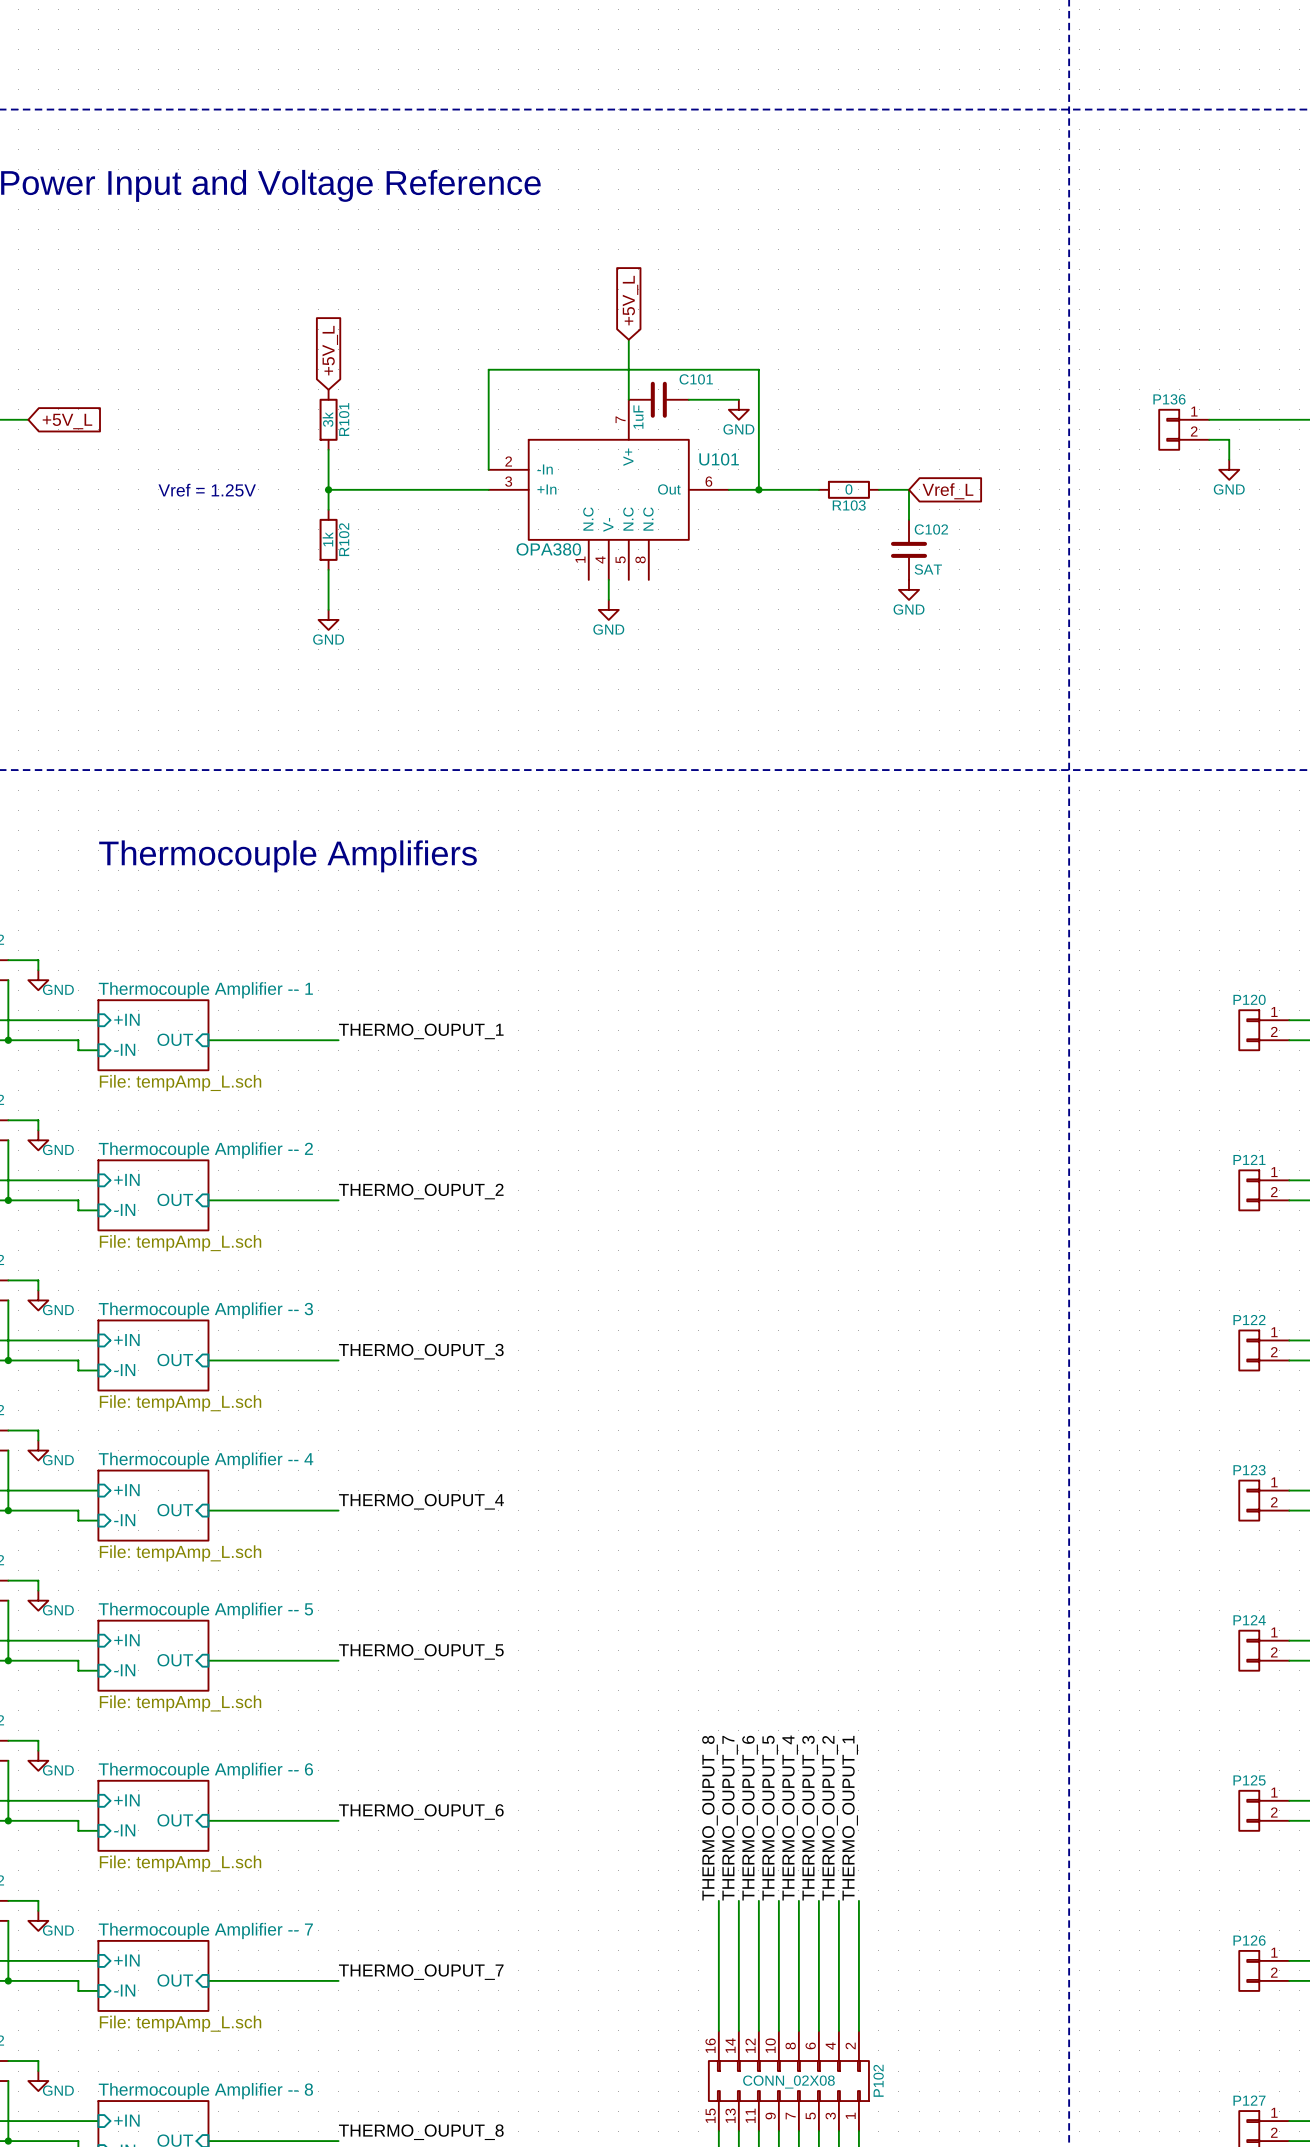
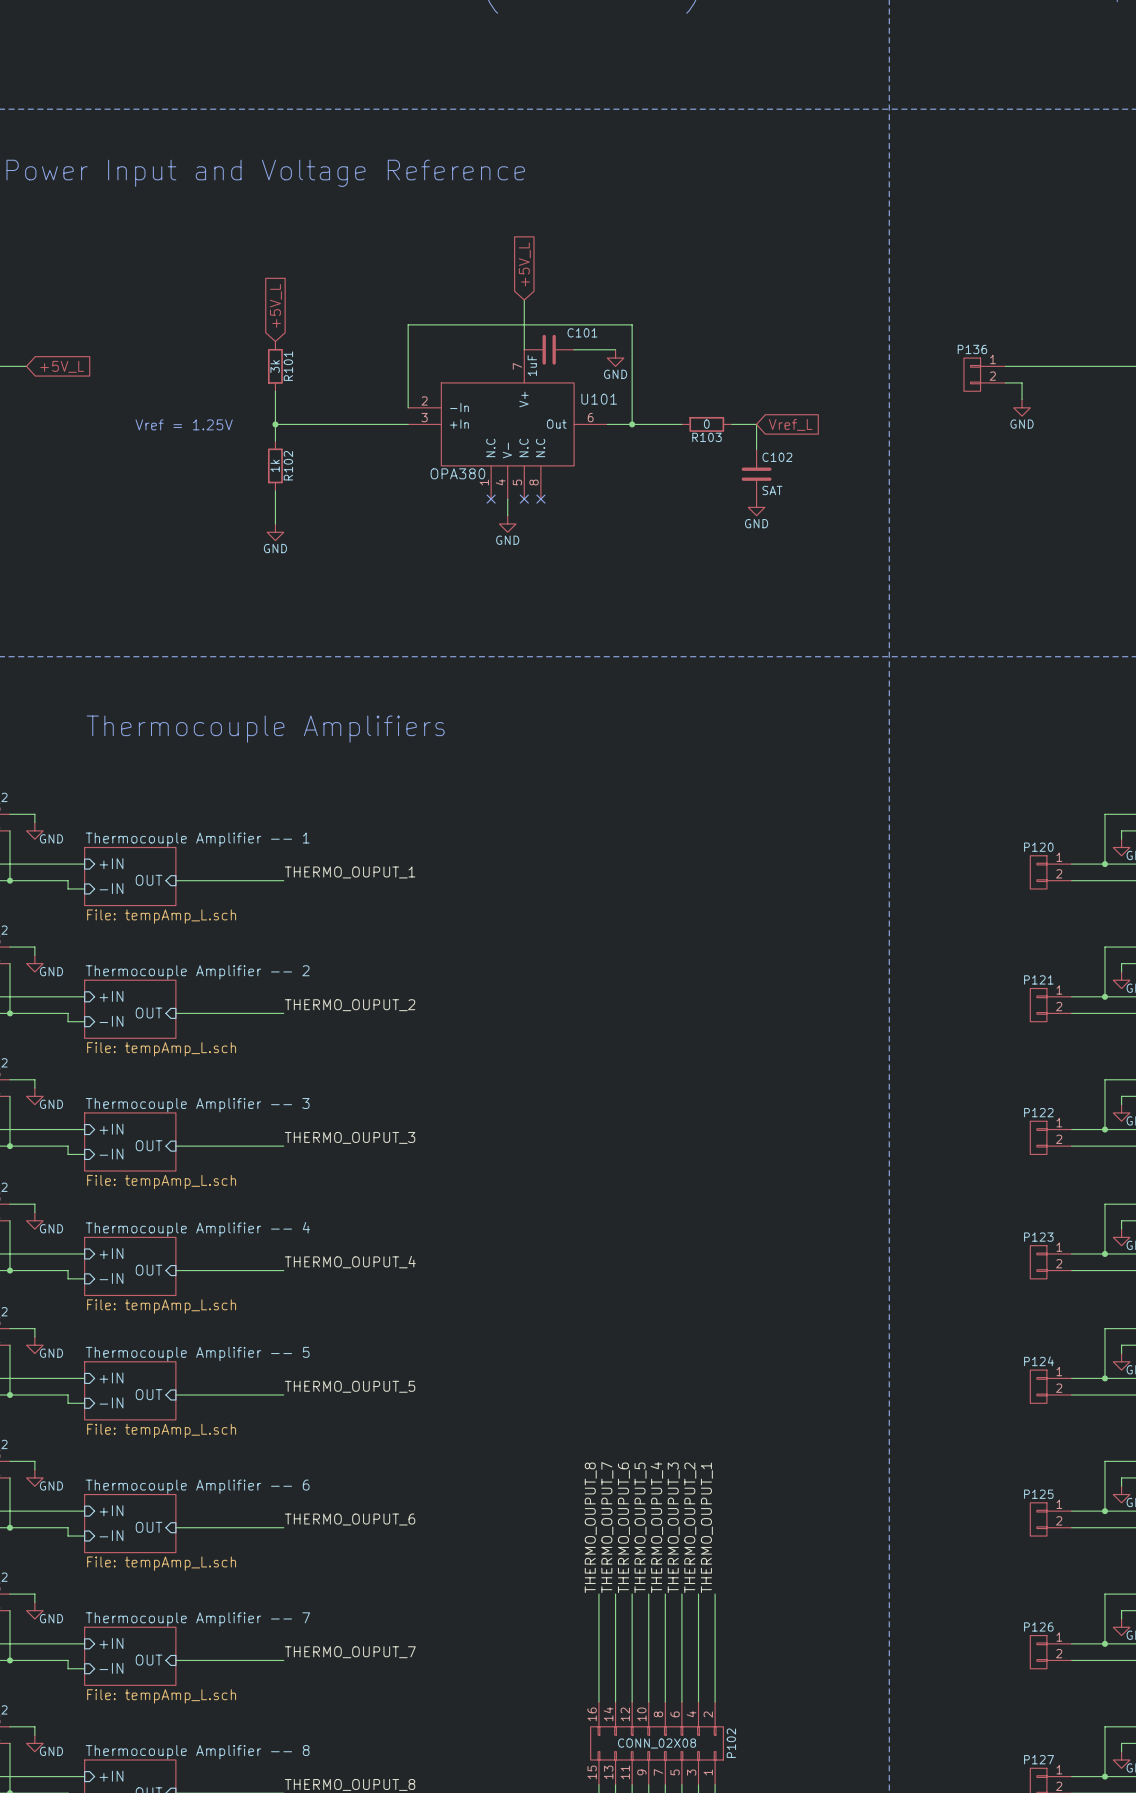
no-connect mark: none -> (491, 499)
no-connect mark: none -> (524, 499)
no-connect mark: none -> (540, 499)

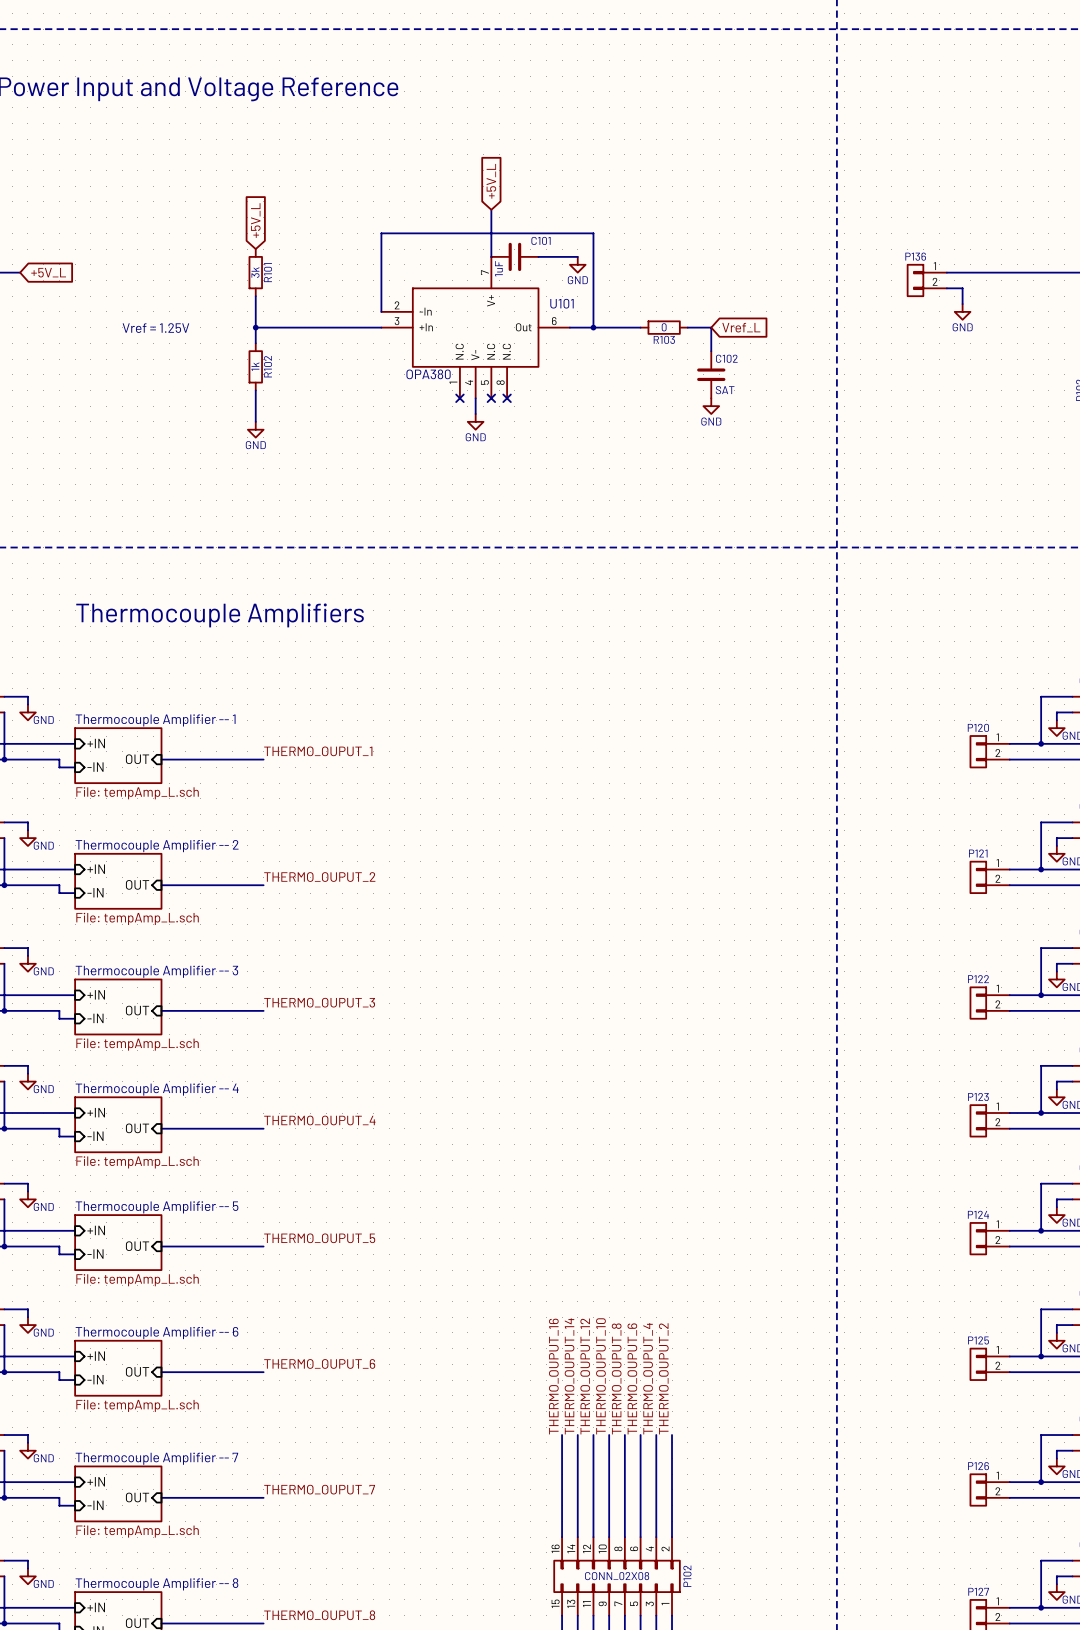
label: THERMO_OUPUT_8 (590, 1527) -> THERMO_OUPUT_16 (553, 1376)
label: THERMO_OUPUT_7 (607, 1527) -> THERMO_OUPUT_14 (569, 1376)
label: THERMO_OUPUT_6 (623, 1527) -> THERMO_OUPUT_12 (585, 1376)
label: THERMO_OUPUT_5 (640, 1527) -> THERMO_OUPUT_10 (600, 1376)
label: THERMO_OUPUT_4 (656, 1527) -> THERMO_OUPUT_8 (616, 1378)
label: THERMO_OUPUT_3 (673, 1527) -> THERMO_OUPUT_6 (632, 1378)
label: THERMO_OUPUT_2 (690, 1527) -> THERMO_OUPUT_4 (648, 1378)
label: THERMO_OUPUT_1 (706, 1527) -> THERMO_OUPUT_2 (663, 1378)

